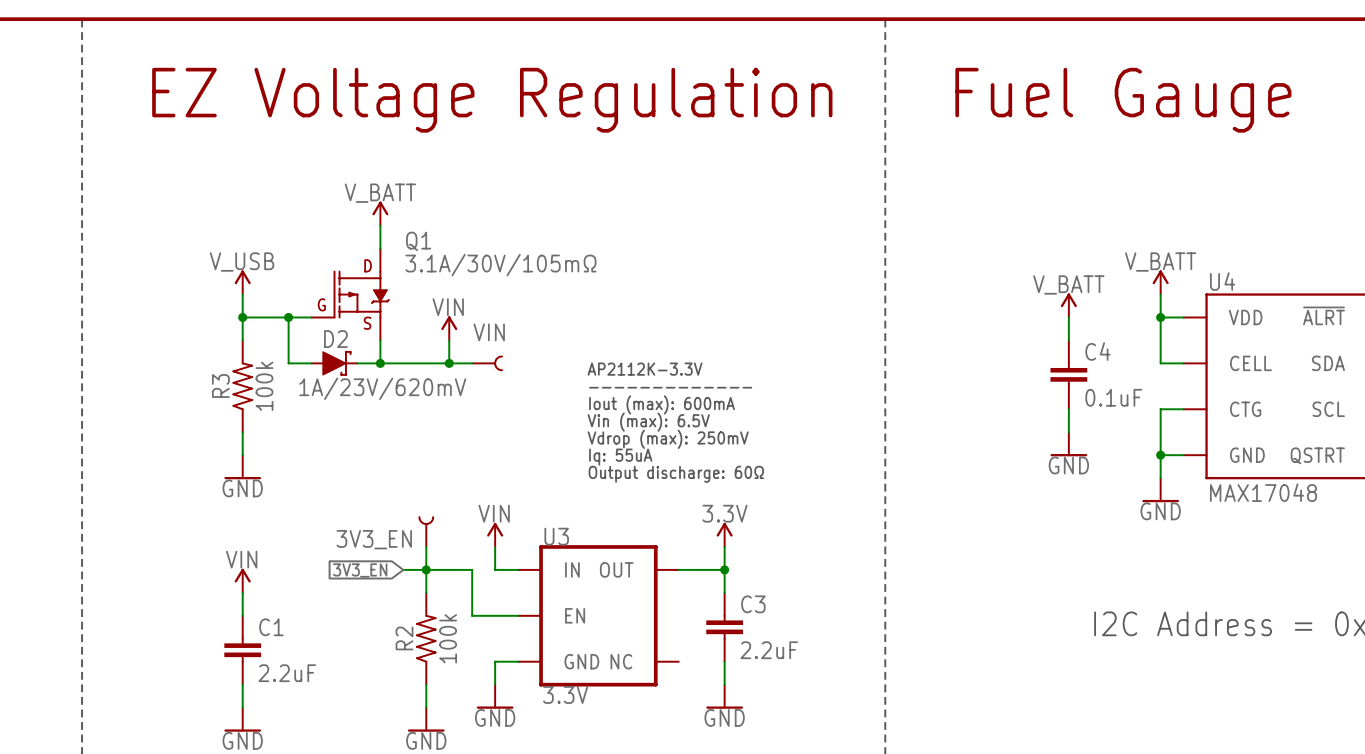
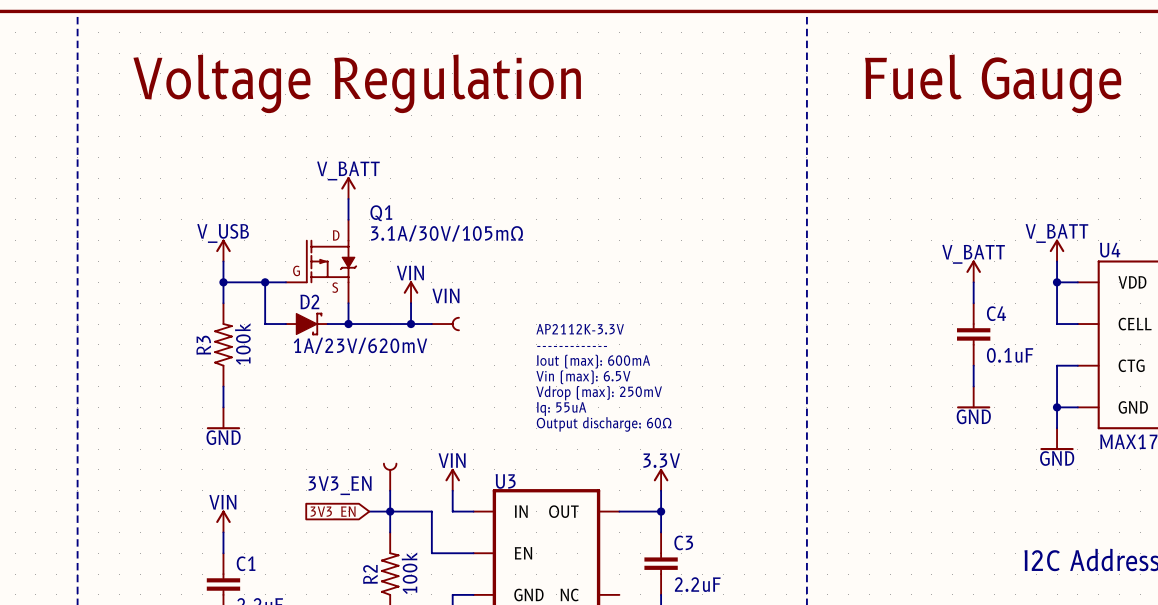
text: EZ Voltage Regulation (492, 100) -> Voltage Regulation (357, 83)

